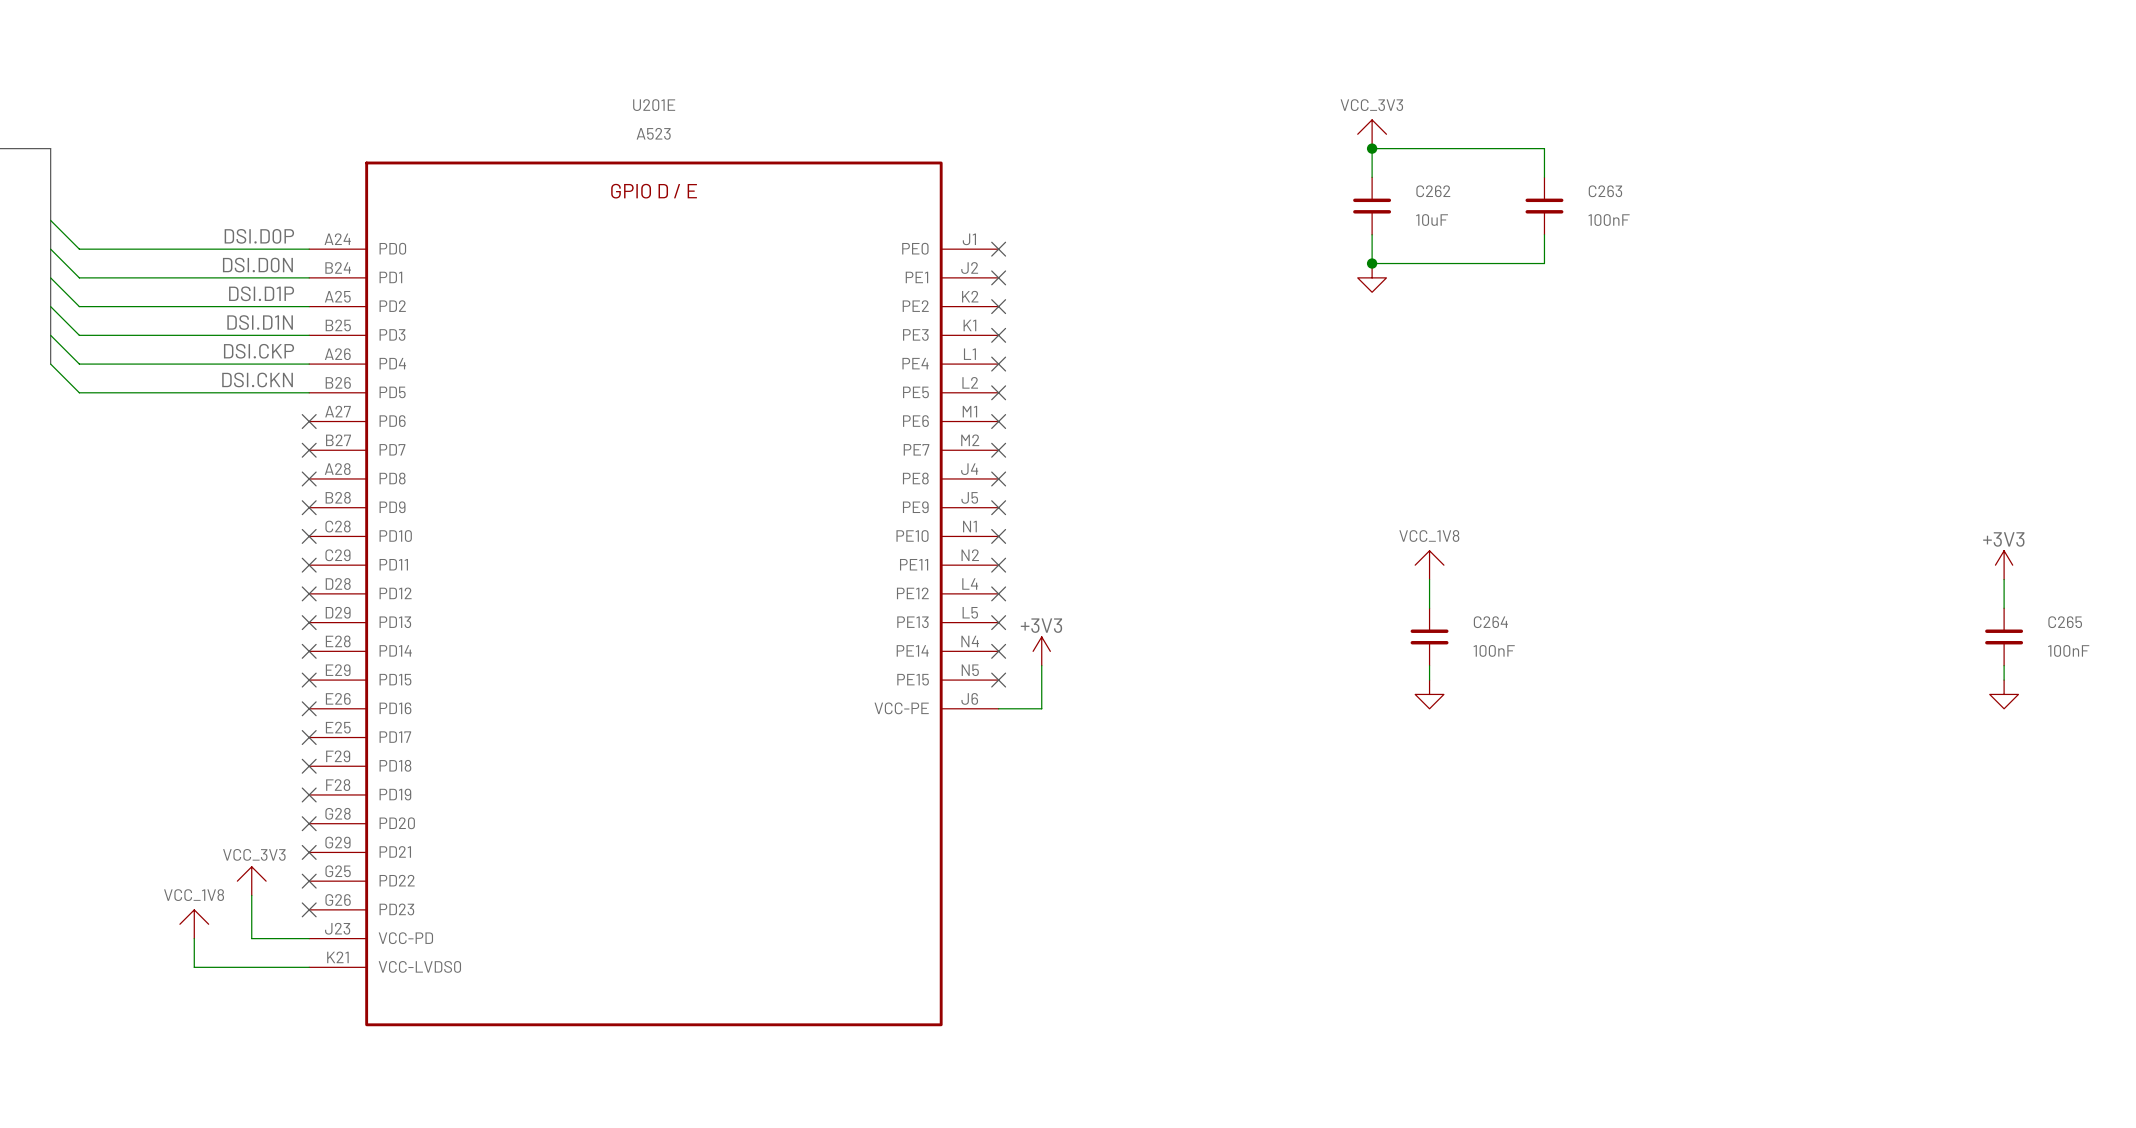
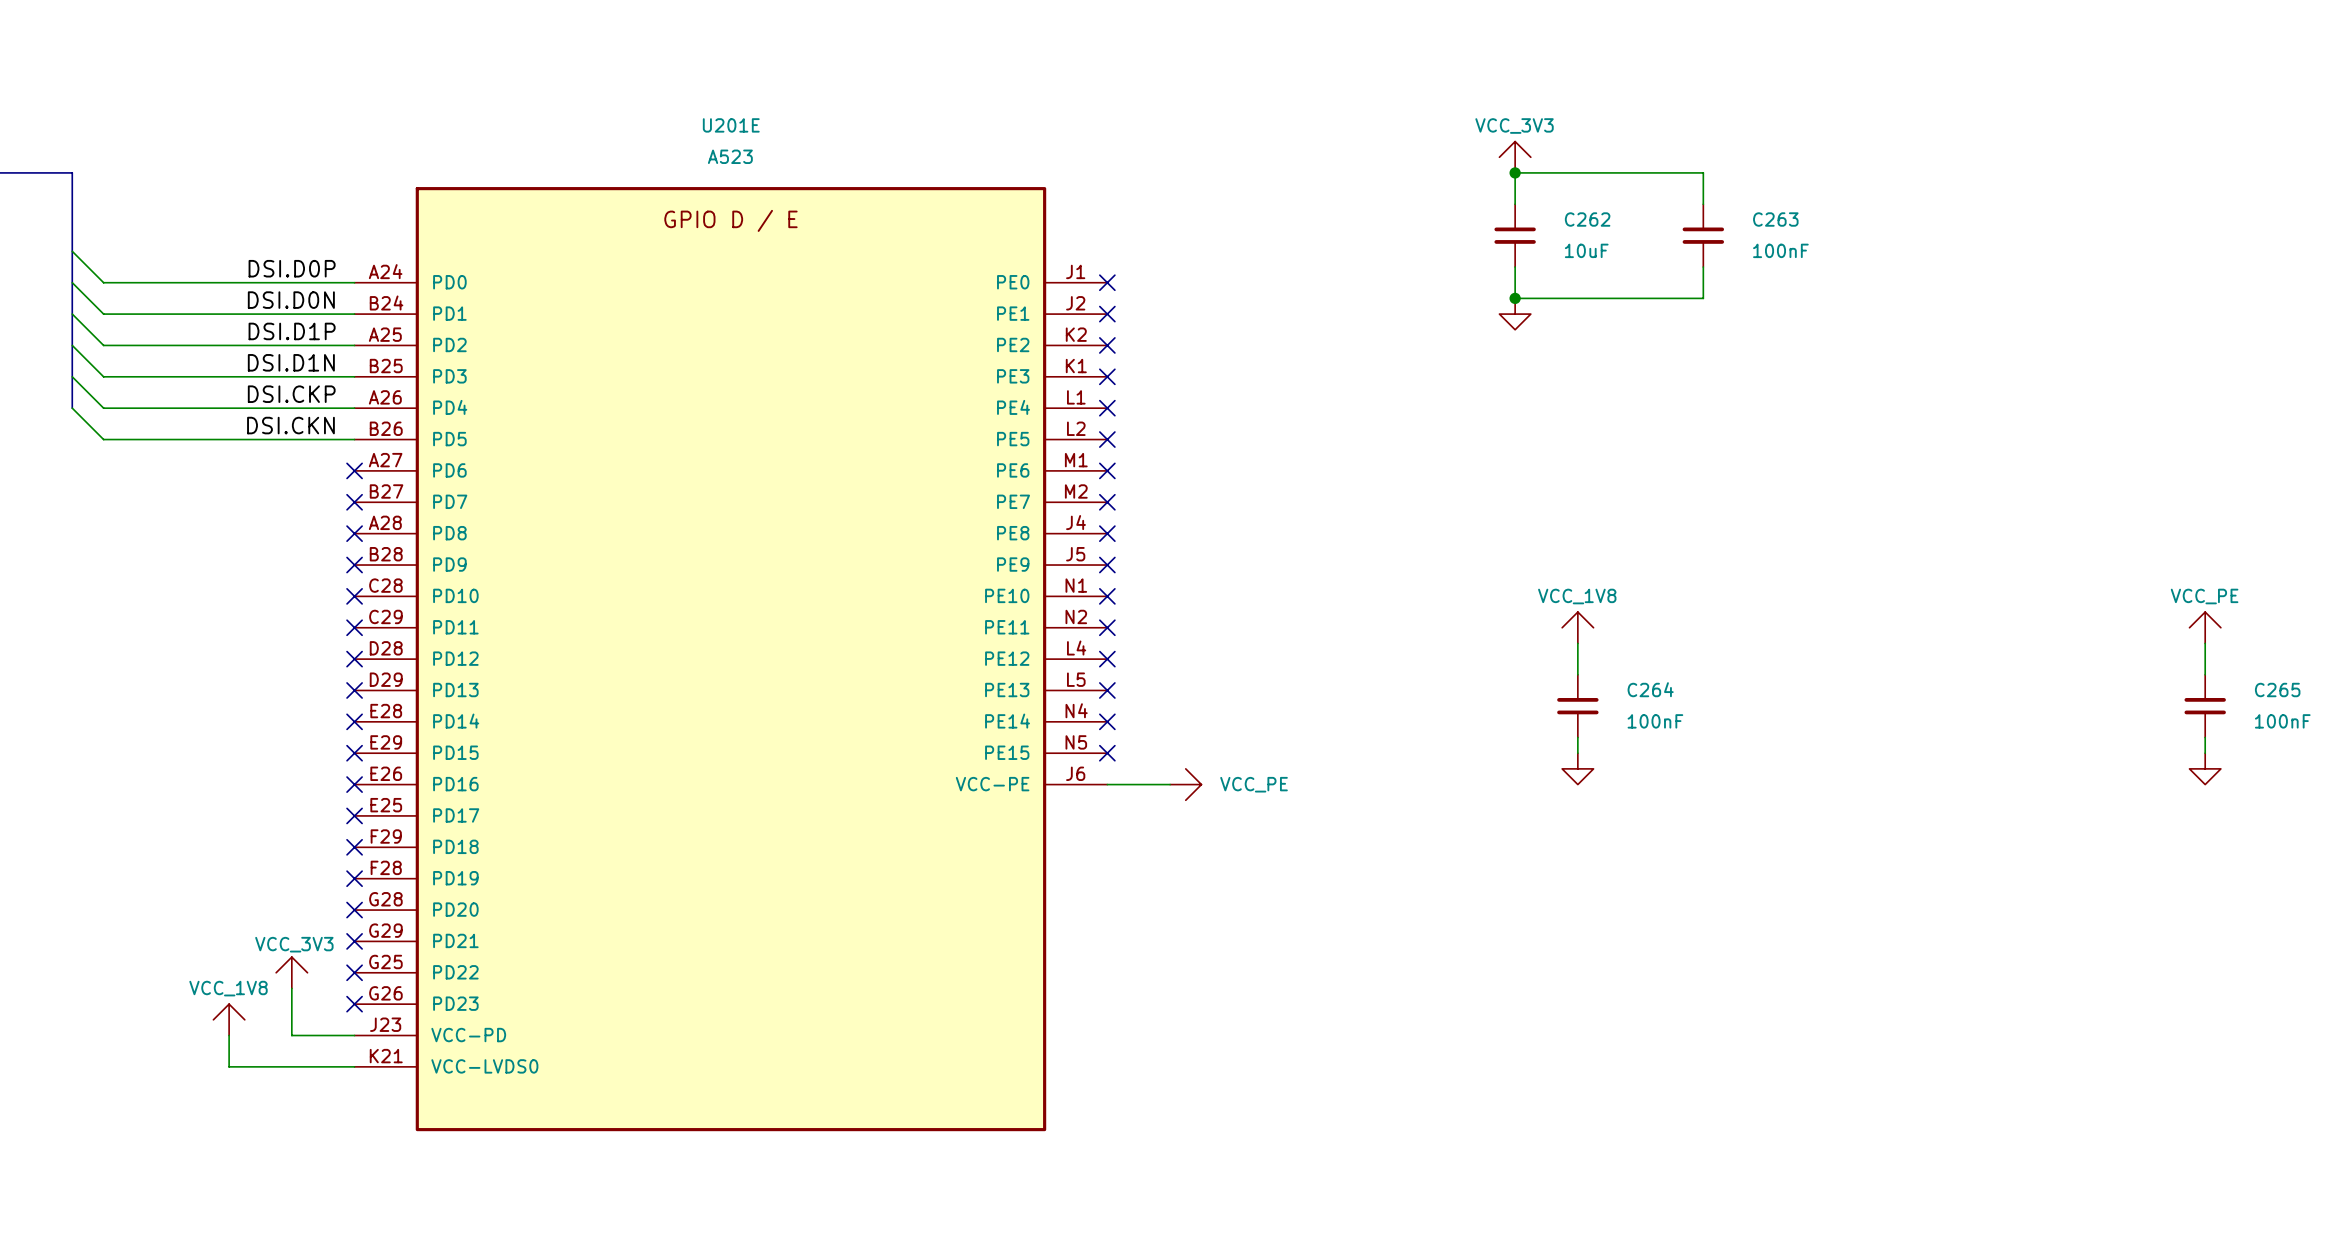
power symbol: +3V3 (2004, 565) -> VCC_PE (2205, 627)
power symbol: +3V3 (1041, 651) -> none
wire: (1041, 665) (1041, 708) -> (1170, 784) (1154, 784)
power symbol: none -> VCC_PE (1185, 784)

